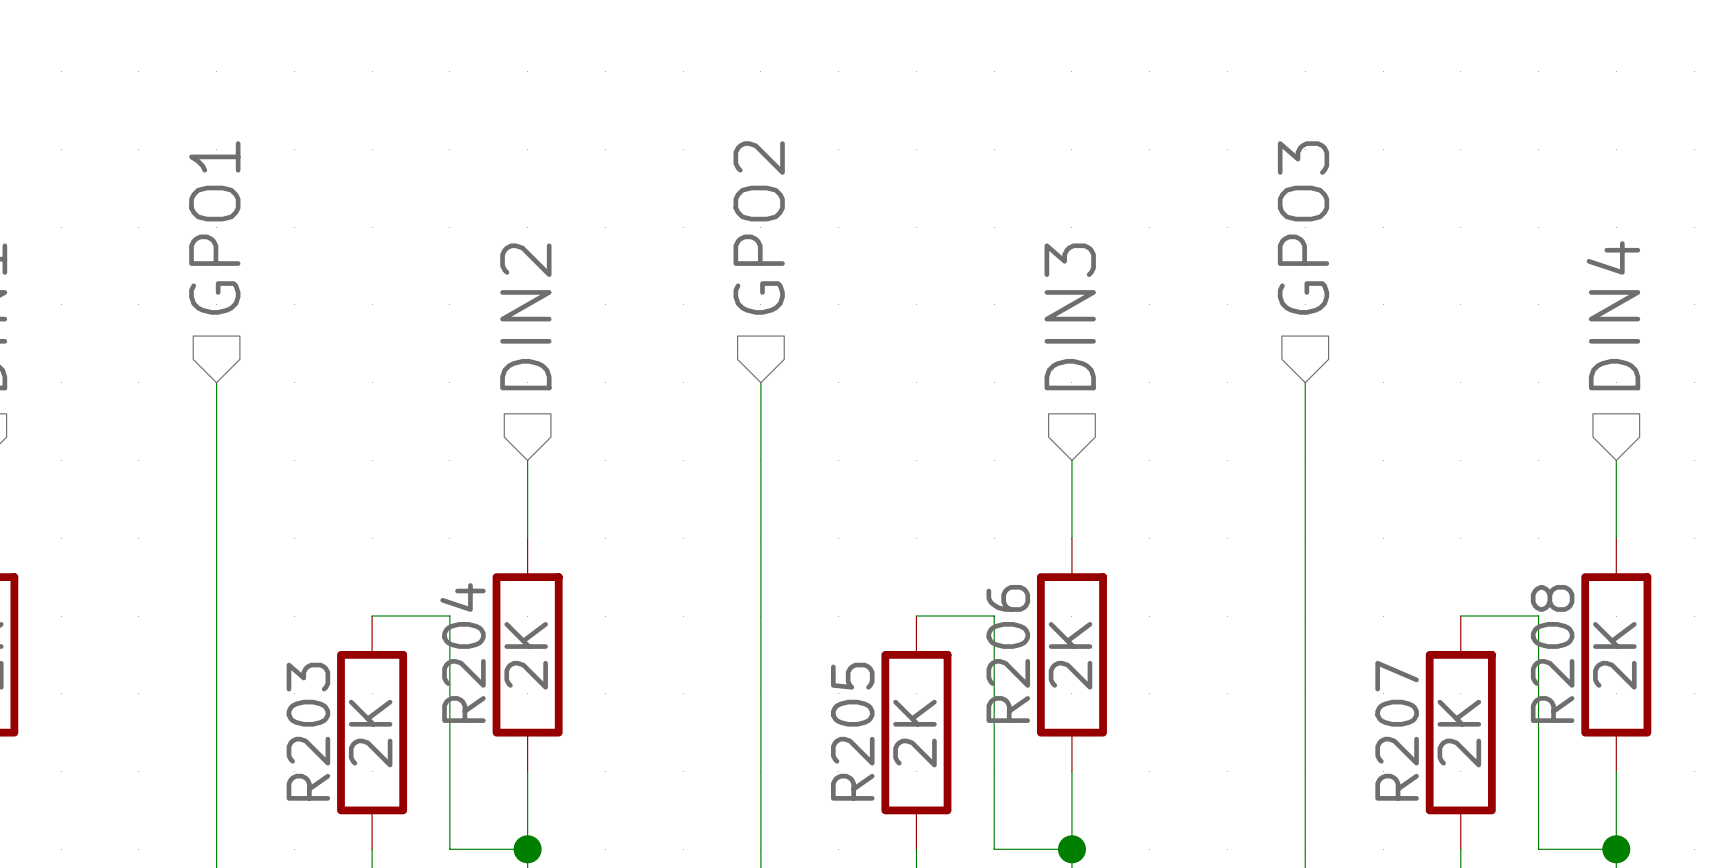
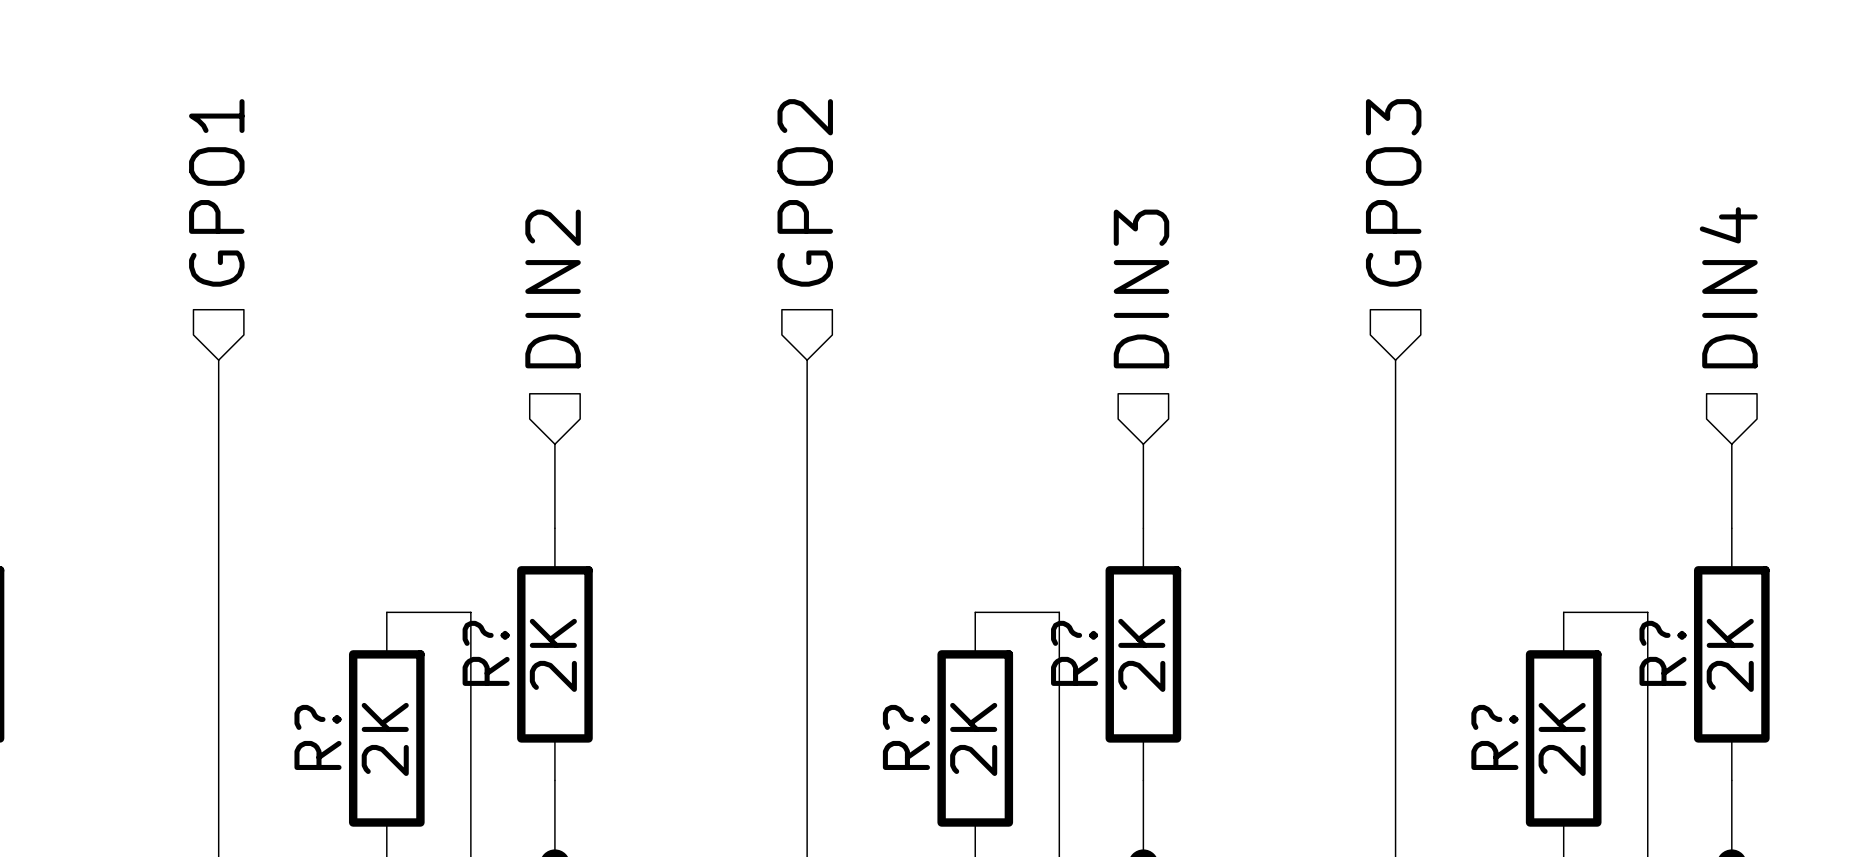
R204 name: R204 (463, 653) -> R? (486, 653)
R206 name: R206 (1008, 653) -> R? (1074, 653)
R208 name: R208 (1552, 653) -> R? (1662, 653)
R207 name: R207 (1397, 730) -> R? (1494, 737)
R203 name: R203 (308, 731) -> R? (317, 737)
R205 name: R205 (852, 731) -> R? (906, 737)

